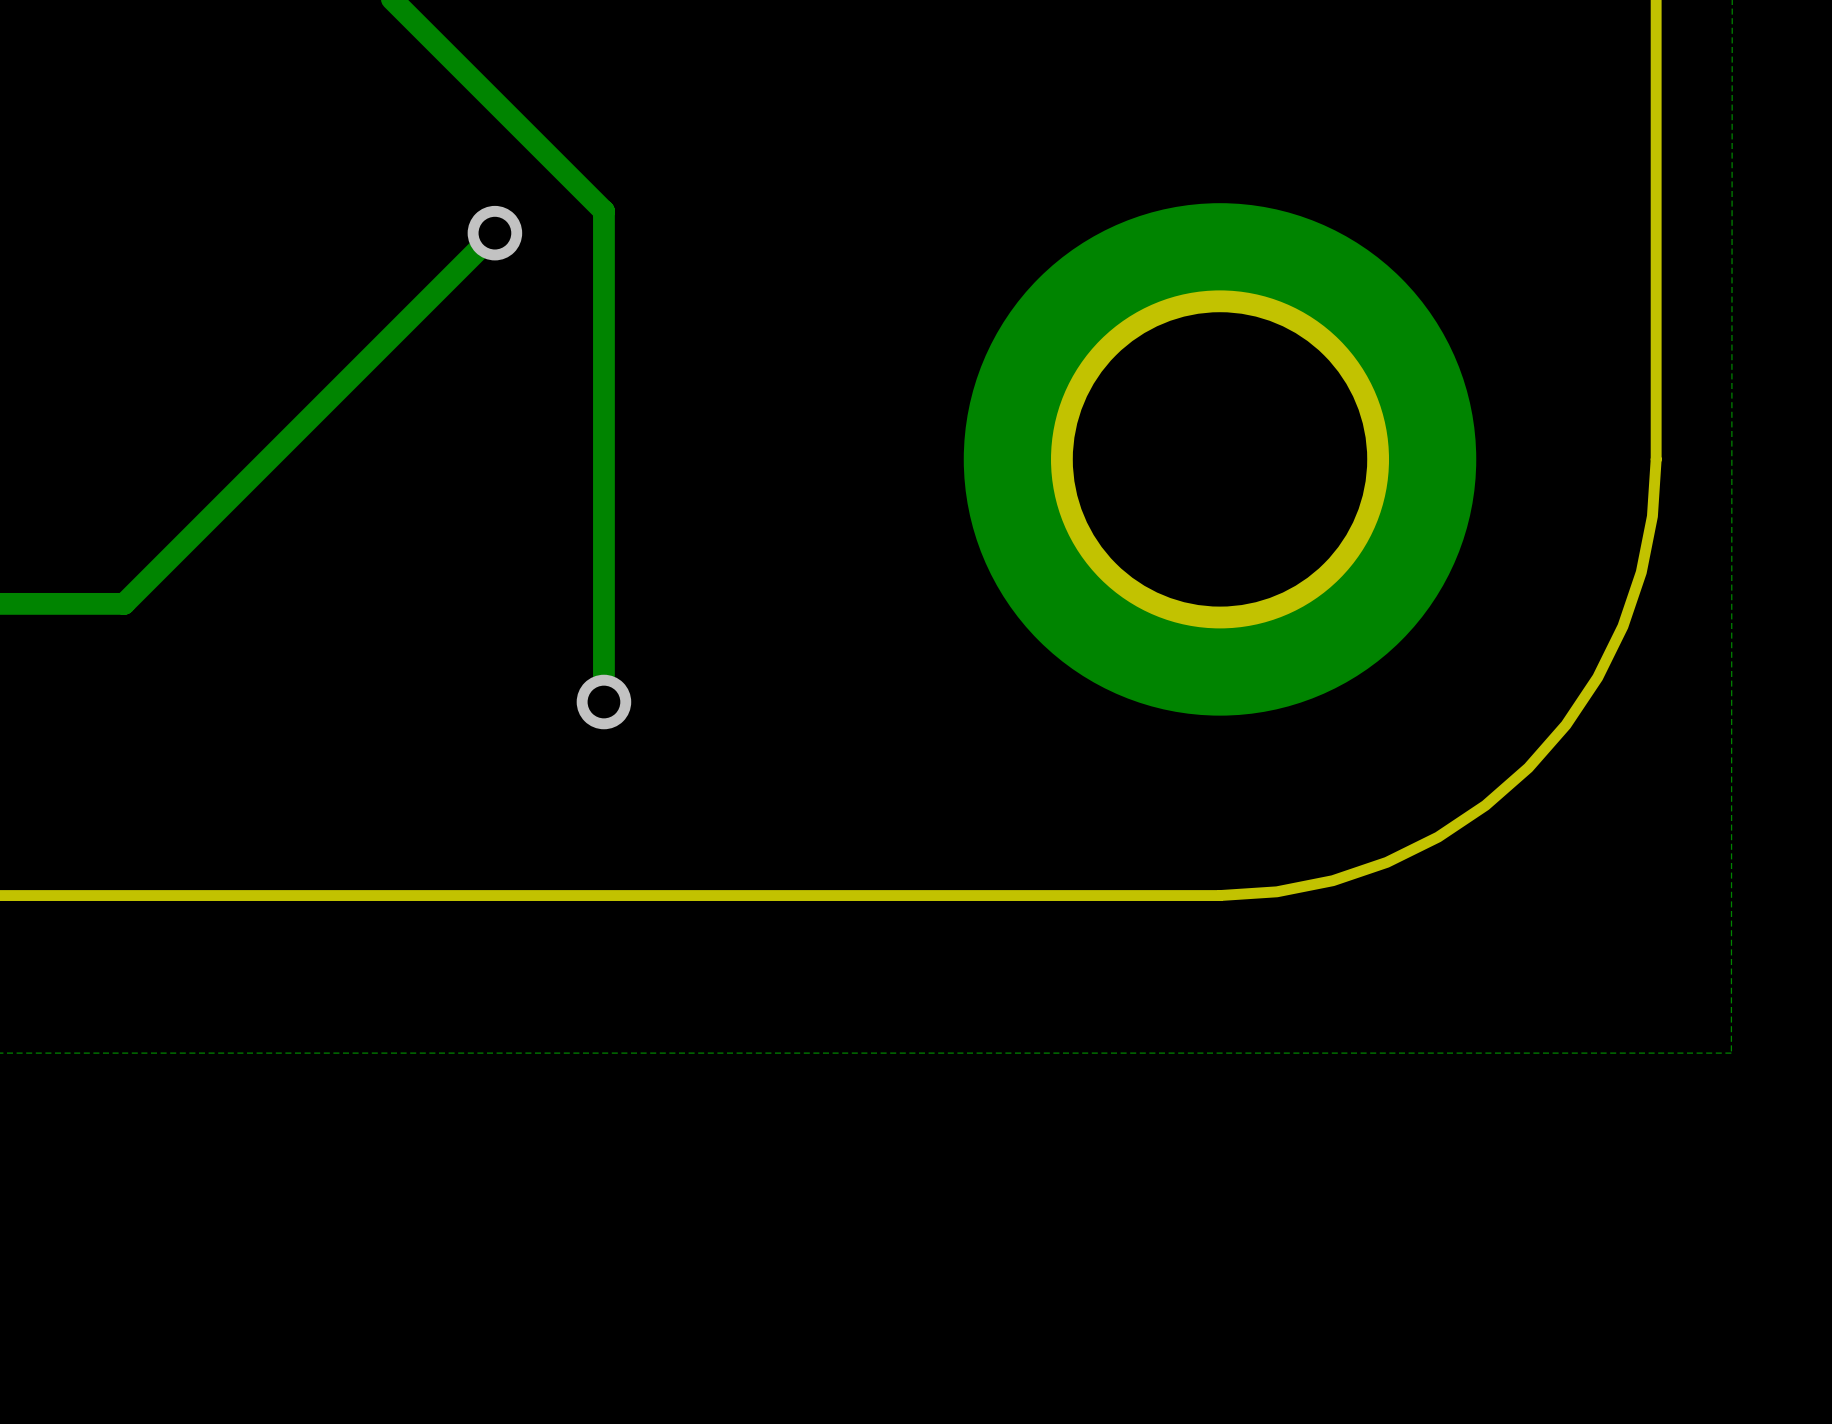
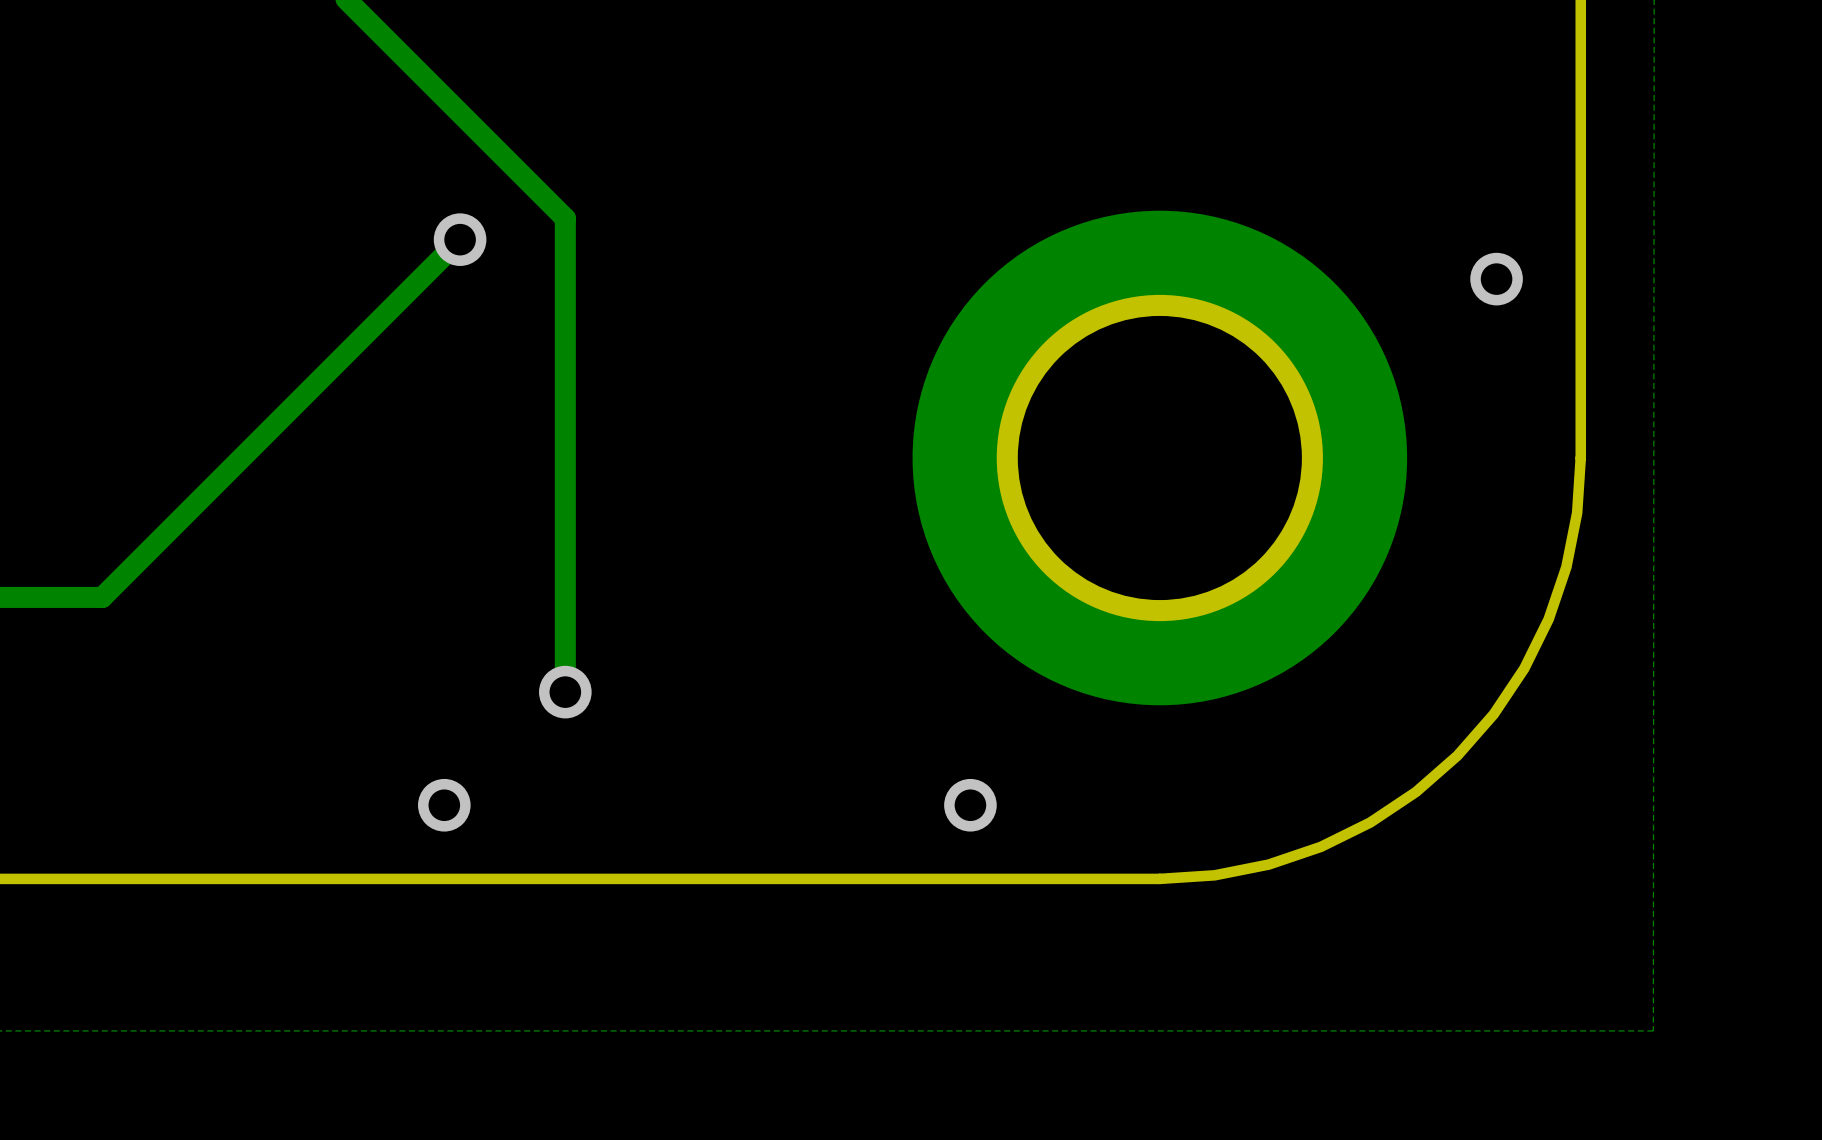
via: none -> (1496, 279)
via: none -> (444, 805)
via: none -> (970, 805)

